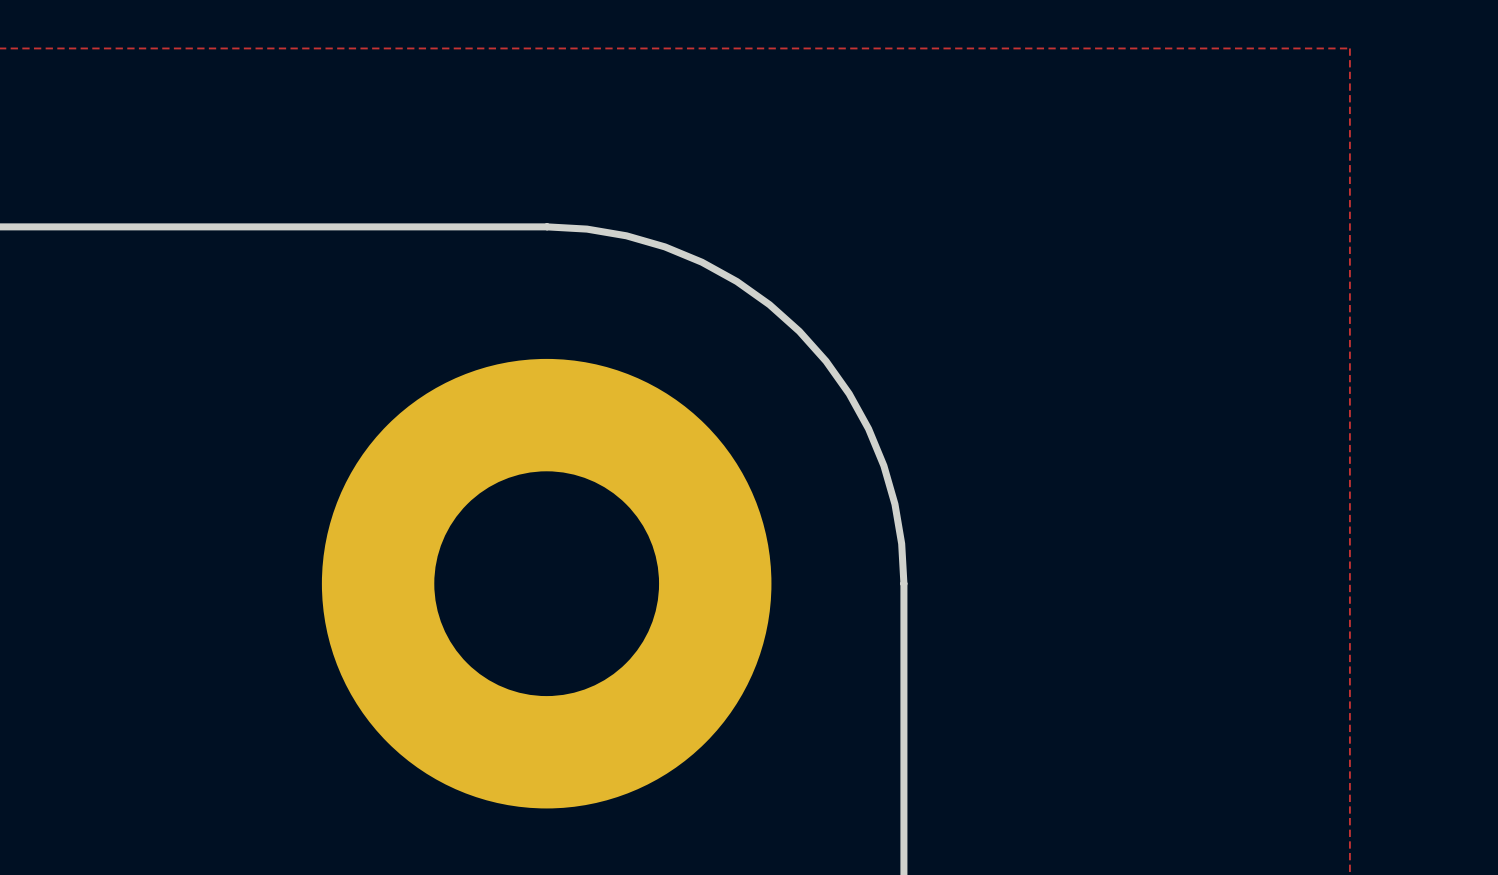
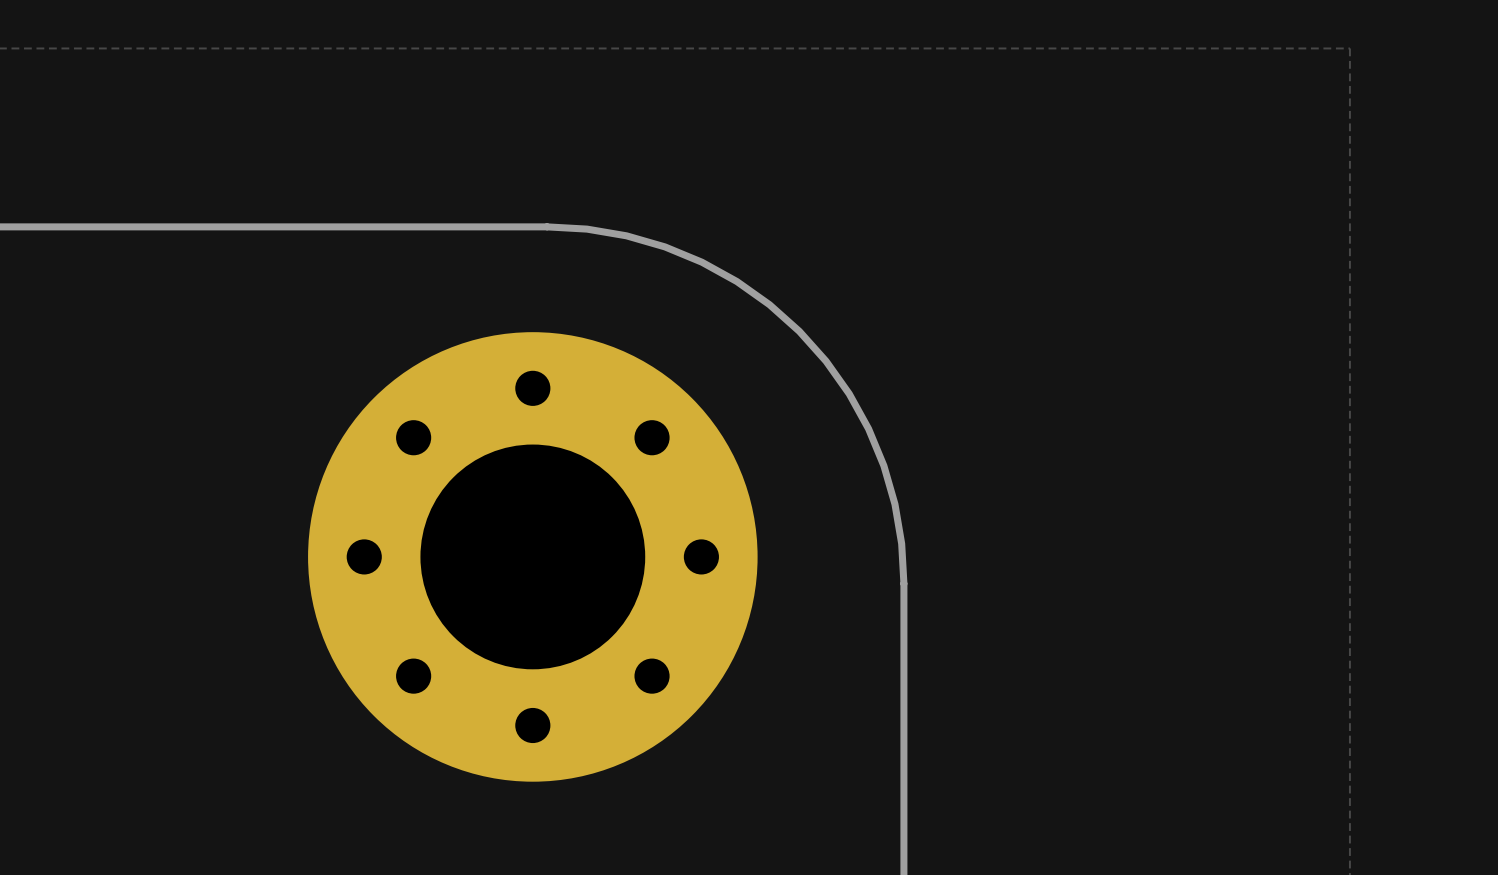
part footprint: [321, 358, 772, 809] -> [308, 332, 758, 782]

